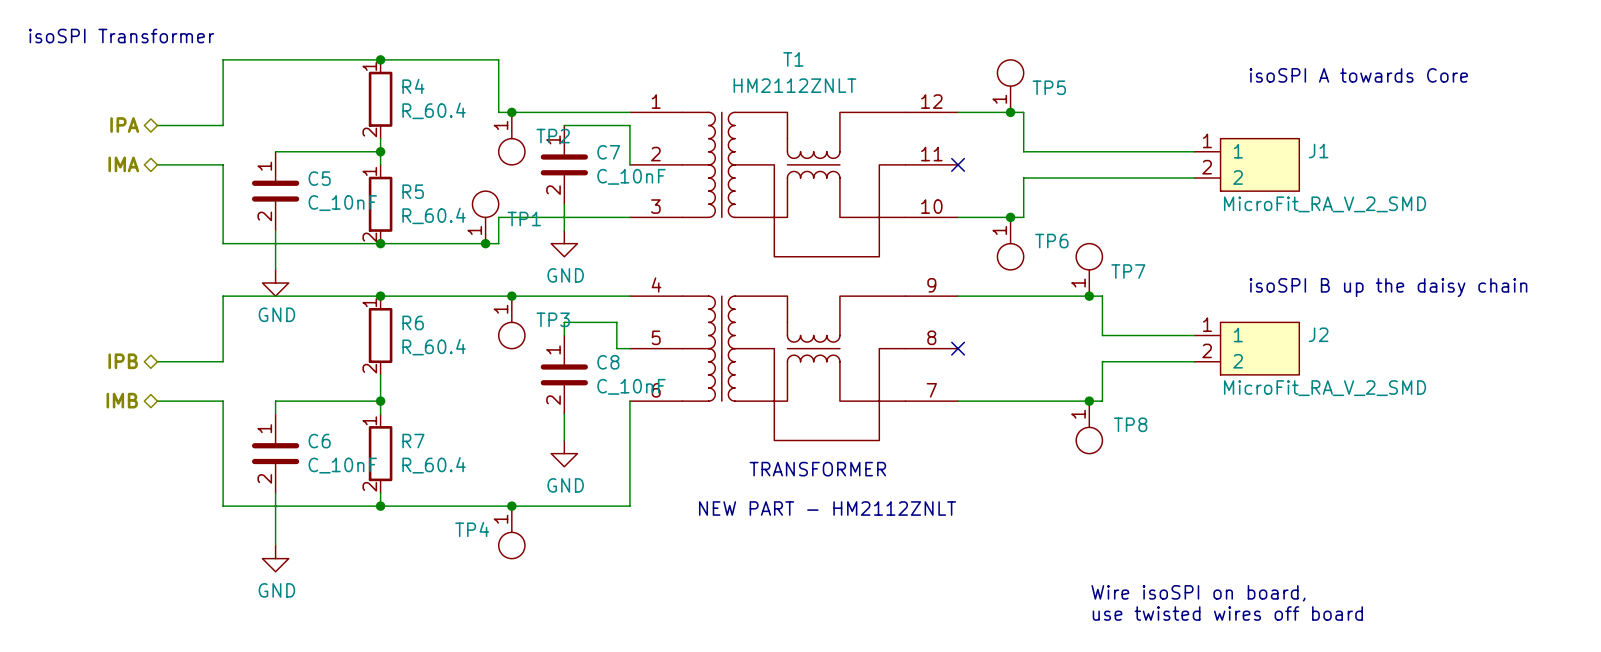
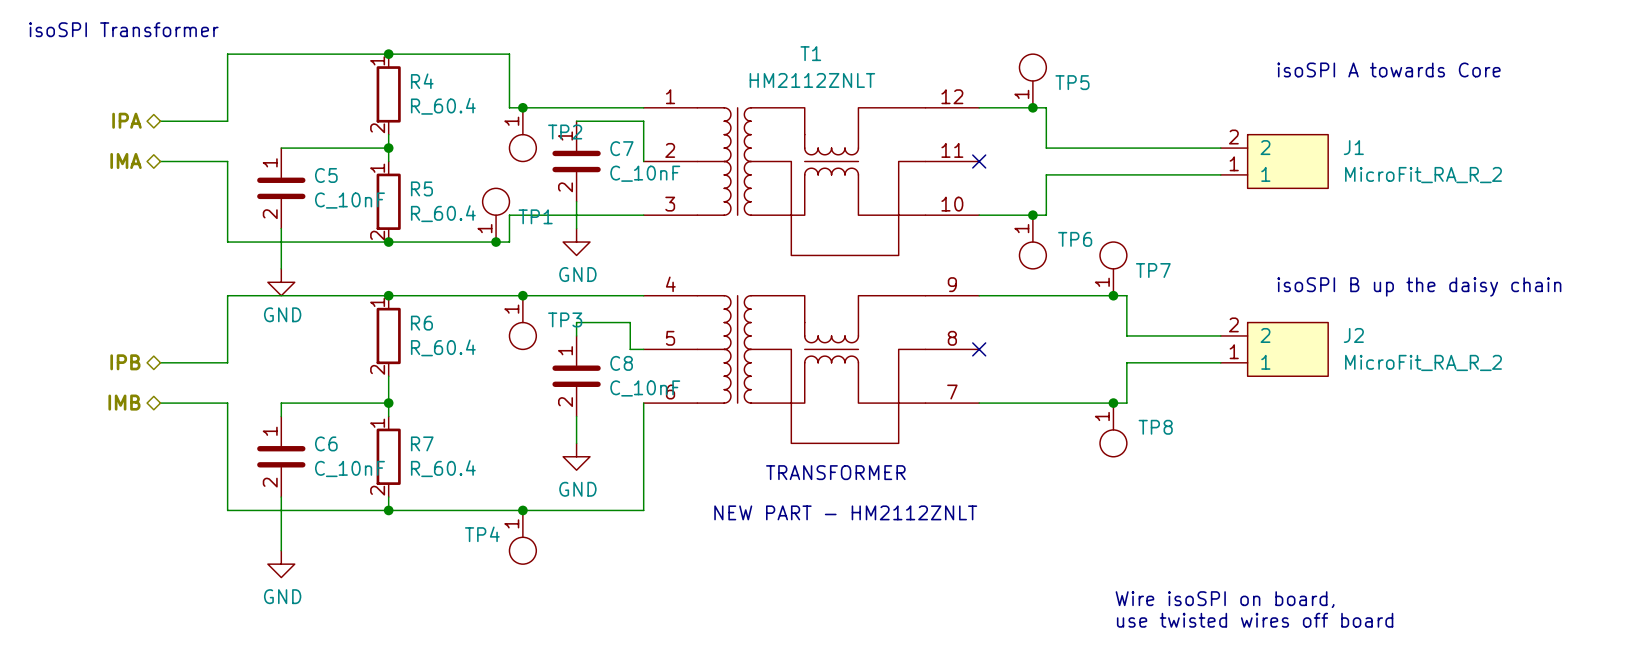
J1 flip: as is (1259, 164) -> up-down (1287, 161)
J1 value: MicroFit_RA_V_2_SMD (1325, 204) -> MicroFit_RA_R_2 (1423, 175)
J2 flip: as is (1259, 348) -> up-down (1287, 349)
J2 value: MicroFit_RA_V_2_SMD (1325, 388) -> MicroFit_RA_R_2 (1423, 362)

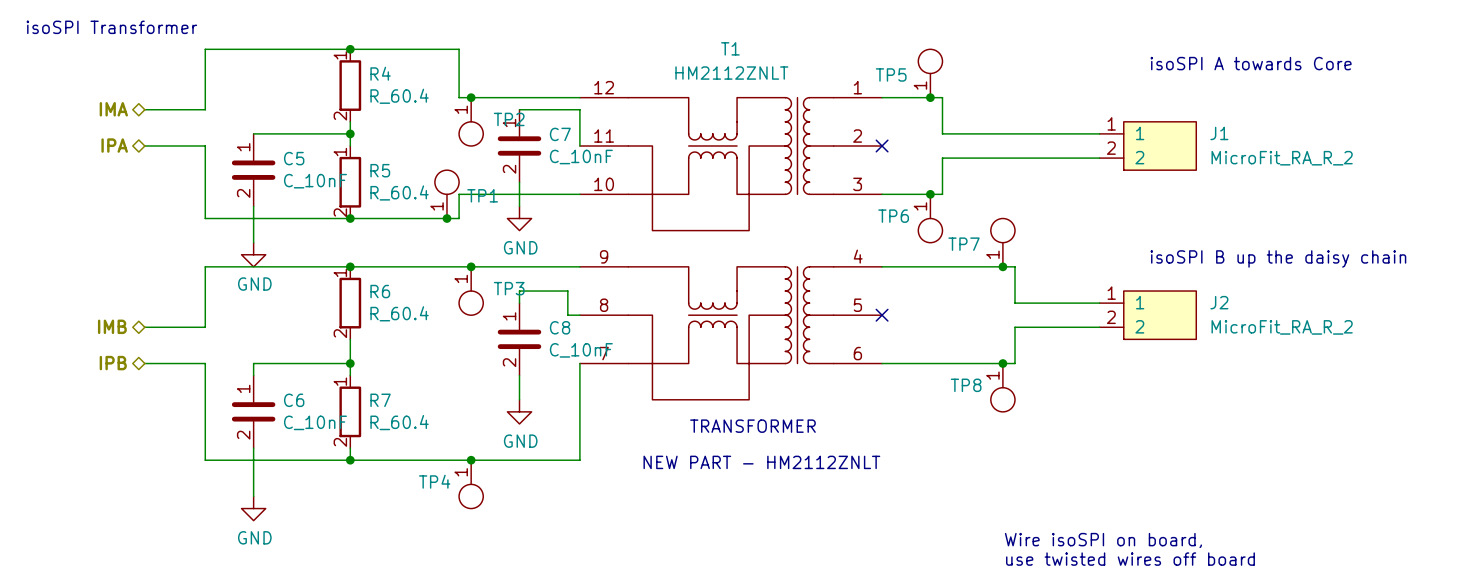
TP5 name position: TP5 (1072, 82) -> TP5 (891, 74)
hierarchical label: IPA (127, 120) -> IMA (113, 109)
hierarchical label: IMA (126, 161) -> IPA (114, 145)
J1 flip: as is (1287, 161) -> up-down (1160, 146)
TP6 name position: TP6 (1075, 239) -> TP6 (893, 216)
TP7 name position: TP7 (1153, 270) -> TP7 (964, 244)
T1 flip: as is (811, 275) -> left-right (730, 248)
J2 flip: as is (1287, 349) -> up-down (1160, 315)
hierarchical label: IPB (125, 362) -> IMB (112, 326)
hierarchical label: IMB (124, 402) -> IPB (113, 363)
TP8 name position: TP8 (1155, 427) -> TP8 (966, 385)

